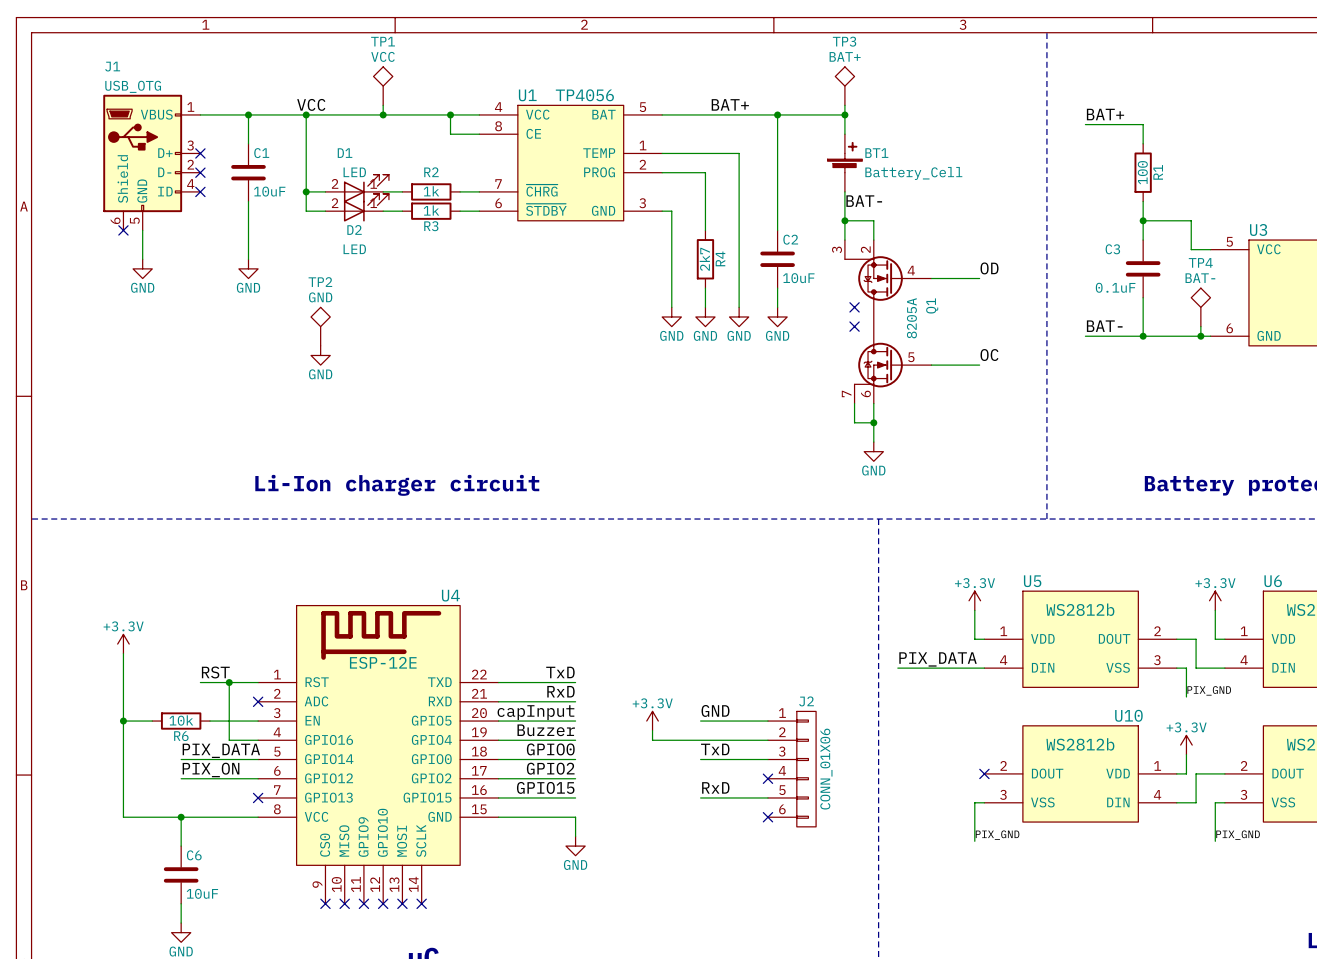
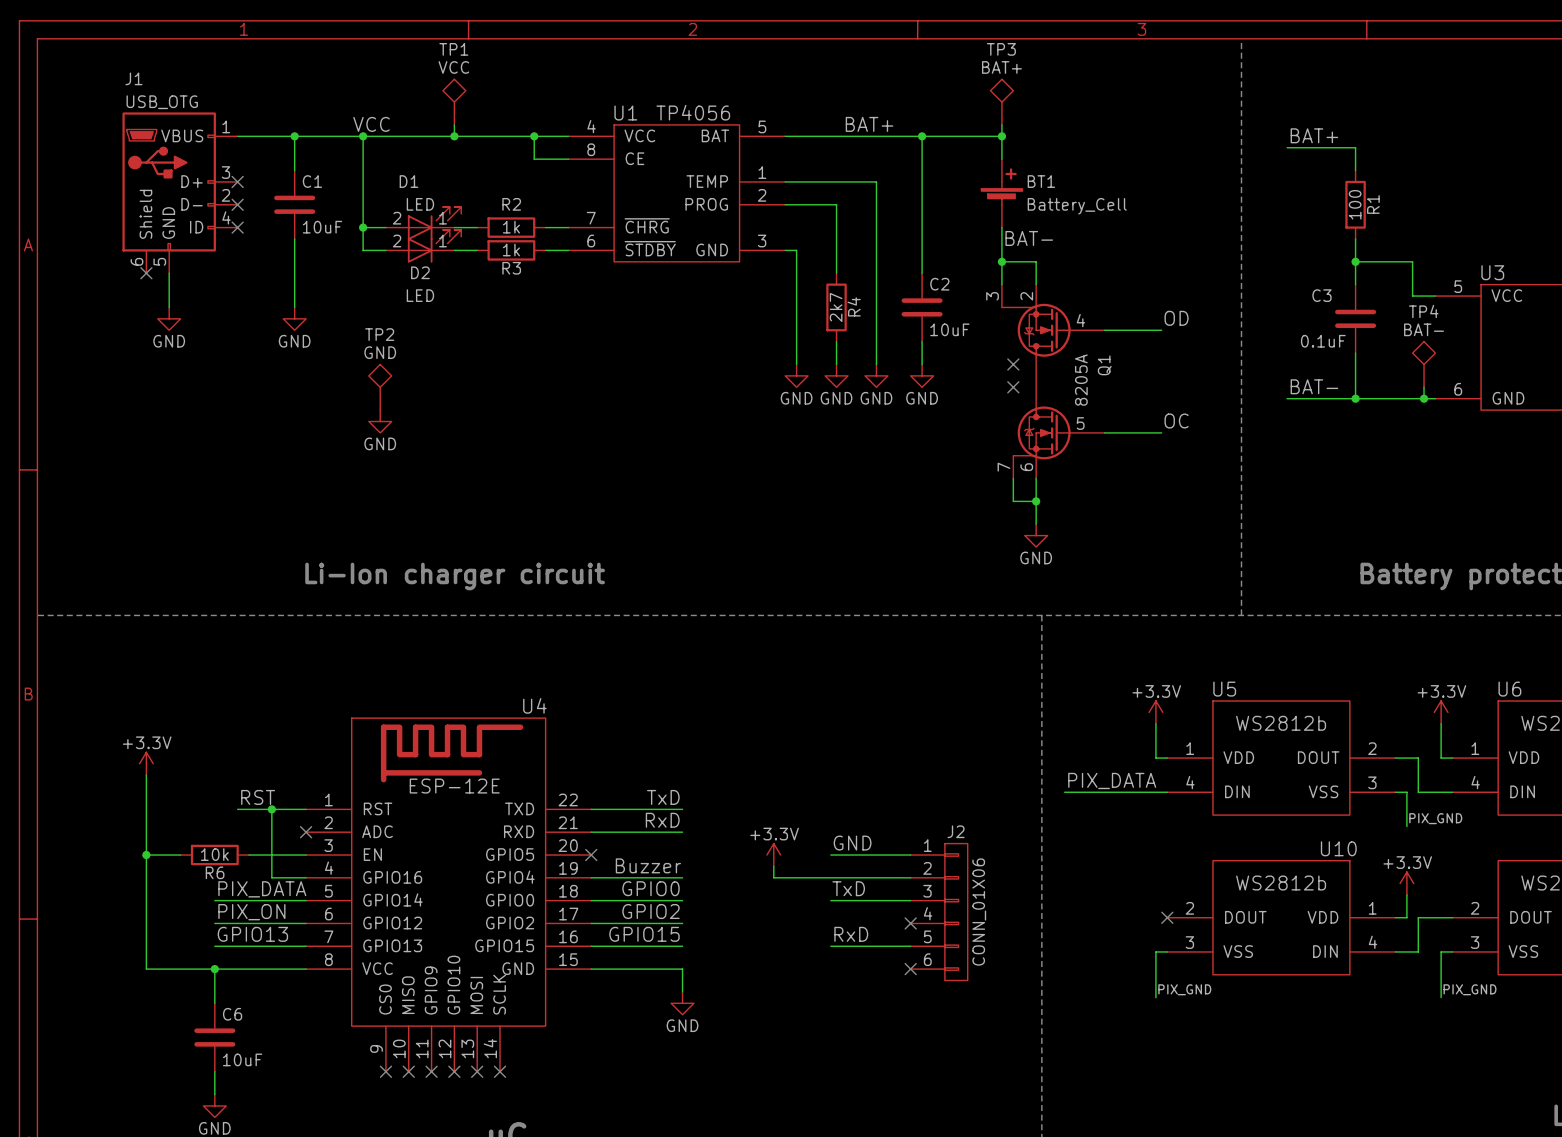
label: capInput (535, 712) -> none
wire: (498, 721) (575, 721) -> none
no-connect mark: none -> (591, 855)
label: none -> GPIO13 (252, 934)
wire: none -> (214, 946) (306, 946)
no-connect mark: (258, 797) -> none

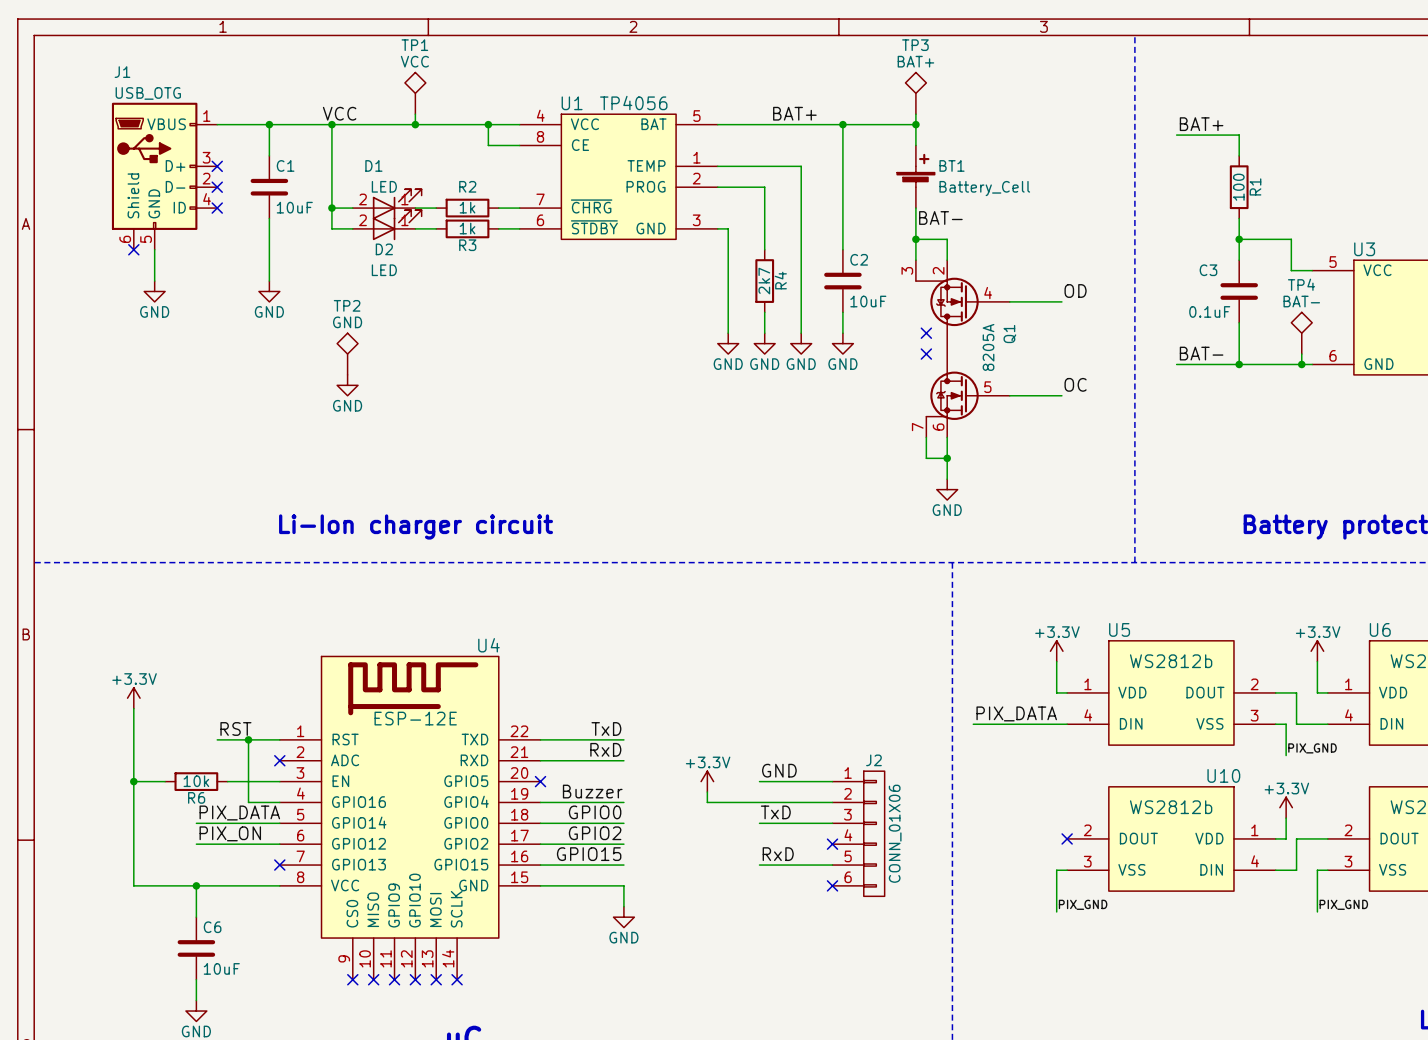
label: GPIO13 (252, 934) -> none
wire: (214, 946) (306, 946) -> none
no-connect mark: none -> (279, 865)

